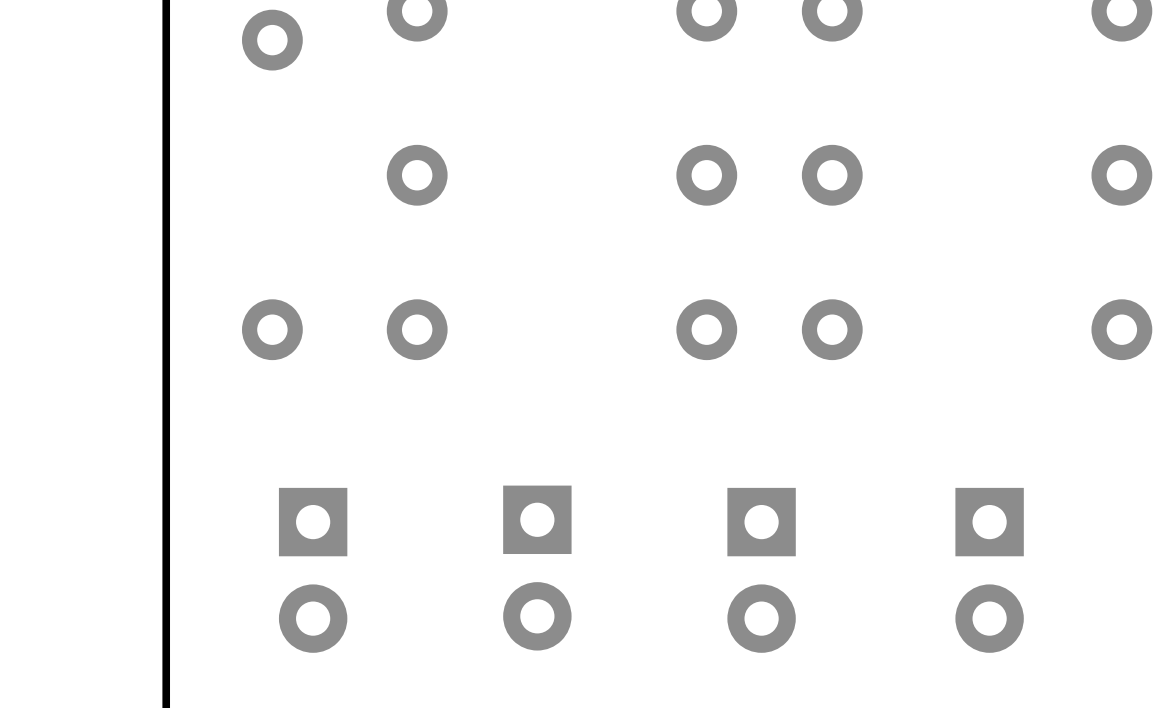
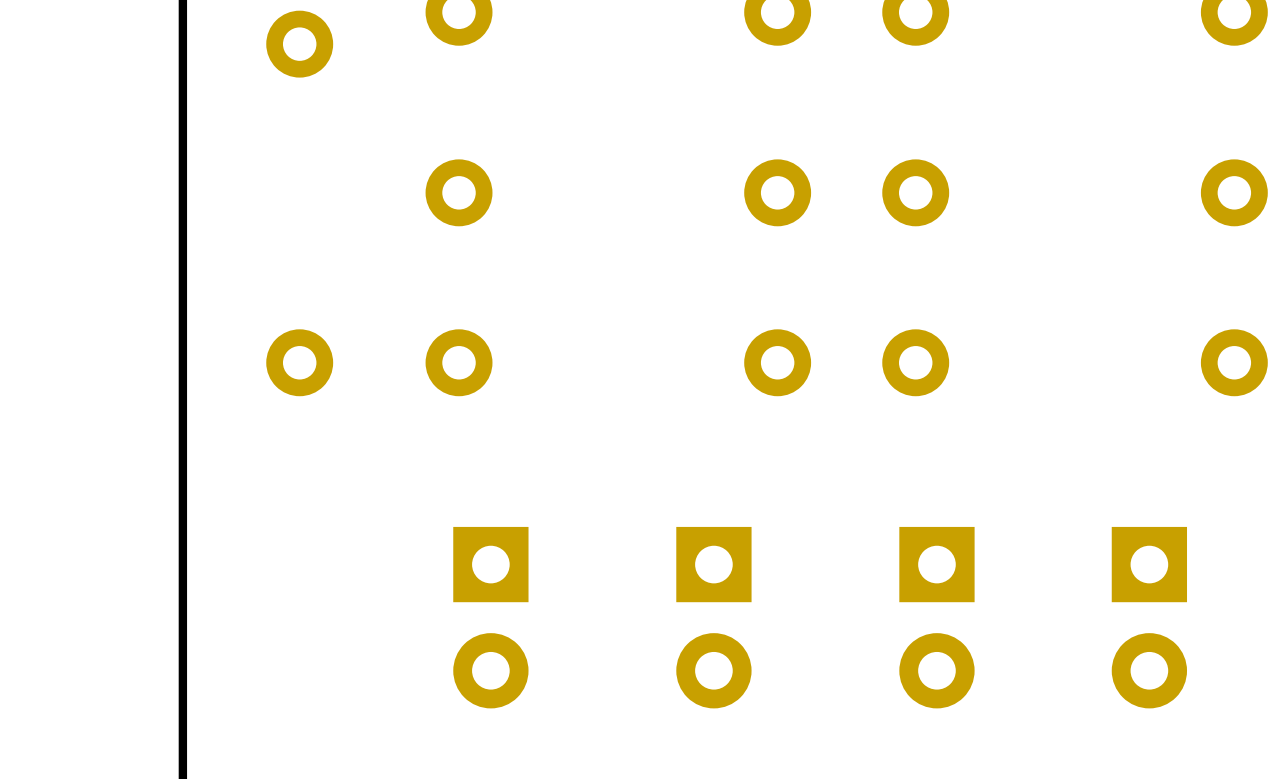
part: none -> (490, 617)
part: none -> (713, 617)
part: none -> (936, 617)
part: (537, 568) -> none
part: (313, 570) -> none
part: (761, 570) -> none
part position: (989, 570) -> (1149, 617)

